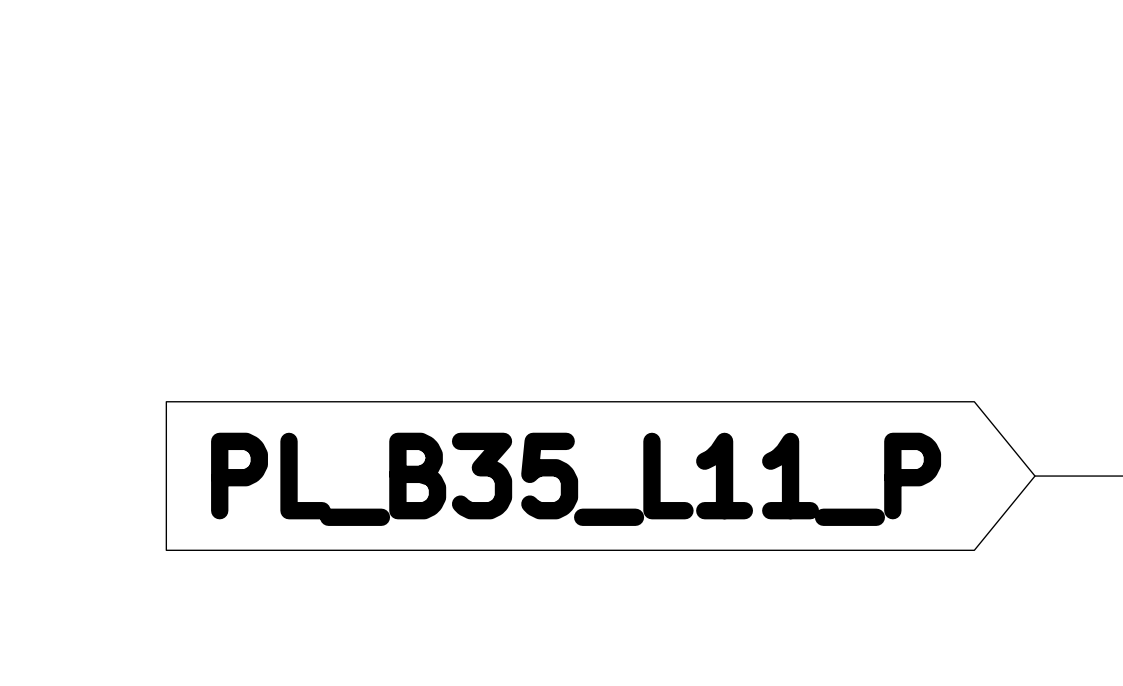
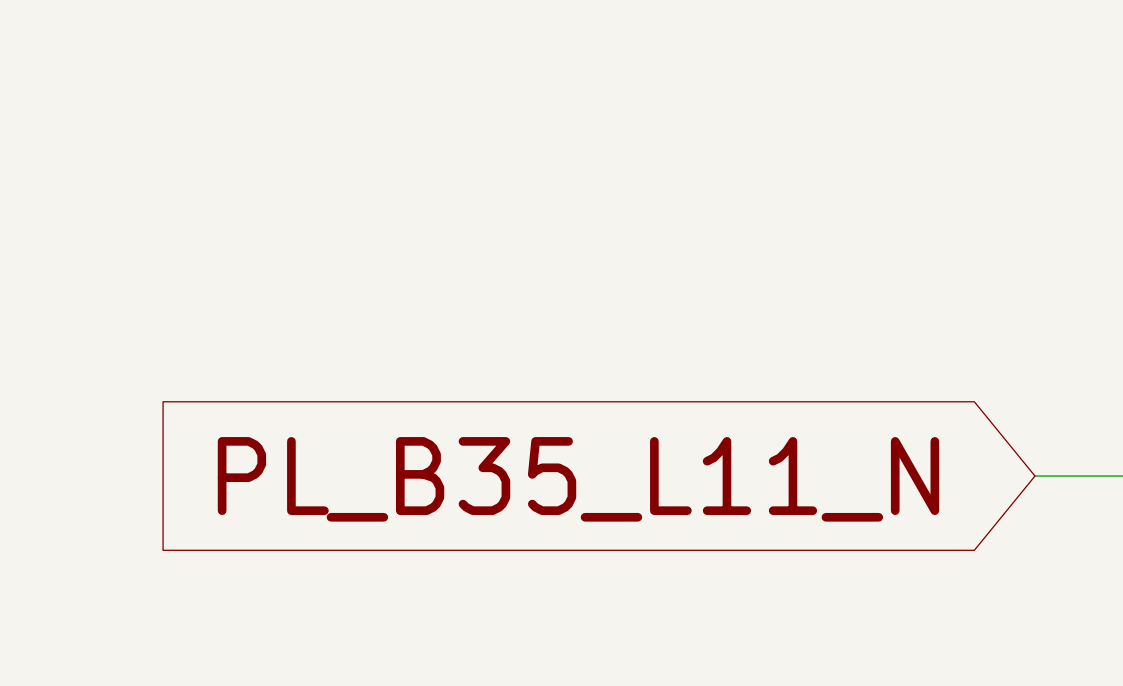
global label: PL_B35_L11_P (576, 479) -> PL_B35_L11_N (578, 479)

